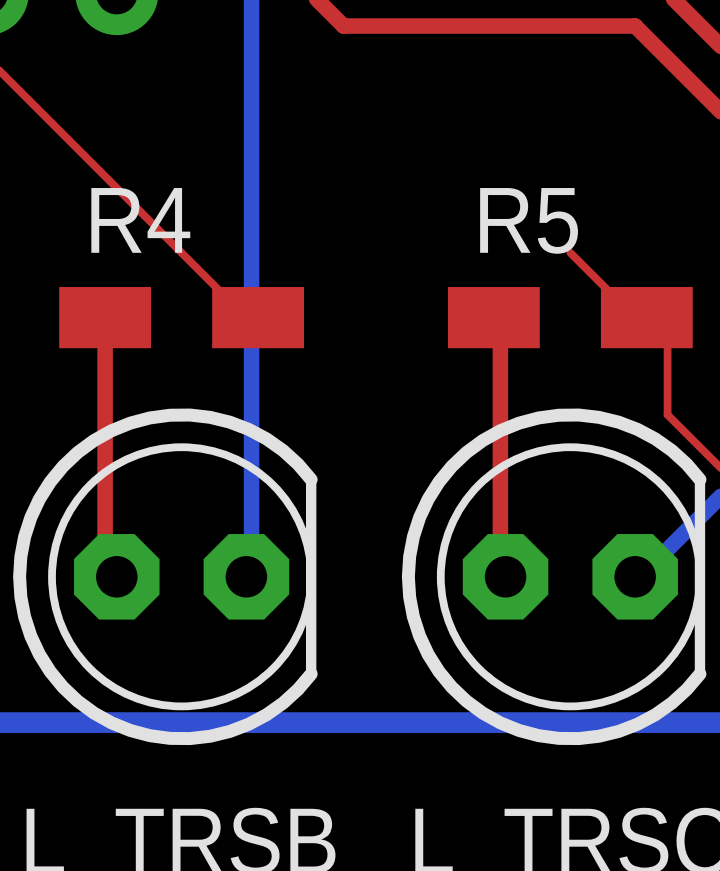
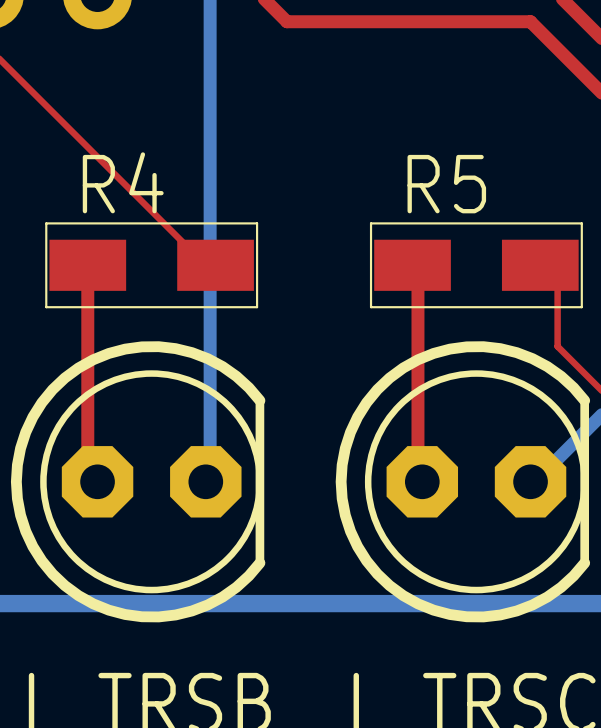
top track: (570, 252) (635, 317) -> none
R4 footprint: [59, 287, 304, 349] -> [45, 222, 259, 309]
R5 footprint: [447, 287, 693, 349] -> [369, 222, 583, 309]

